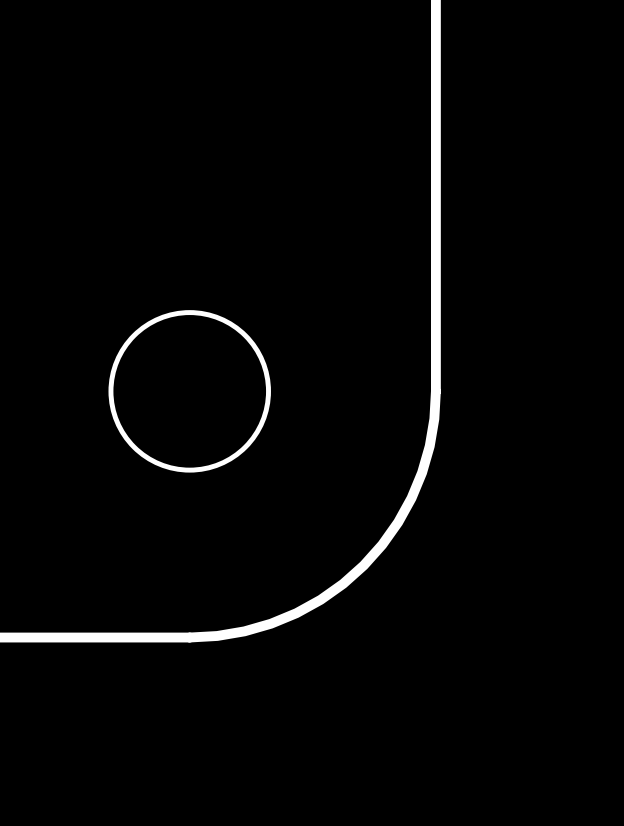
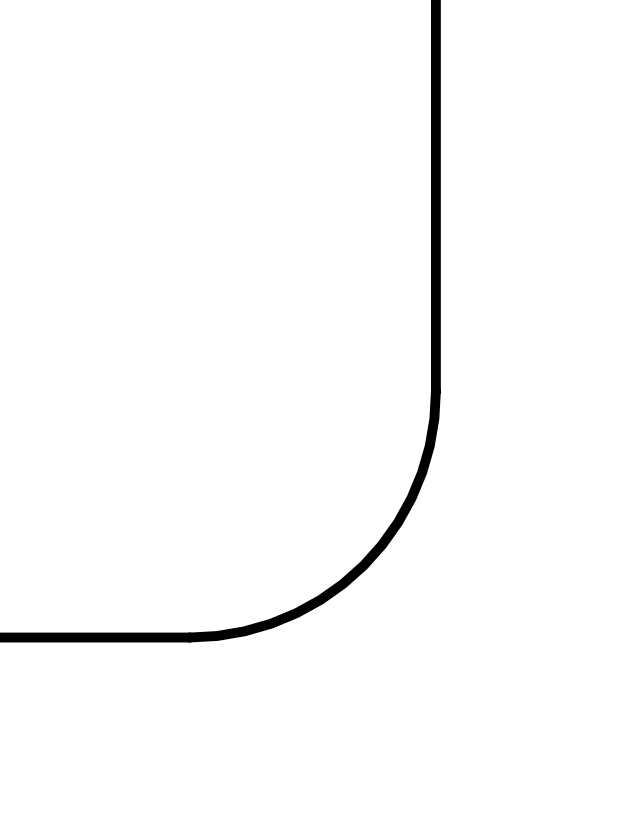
round board edge: [108, 310, 271, 473] -> none

